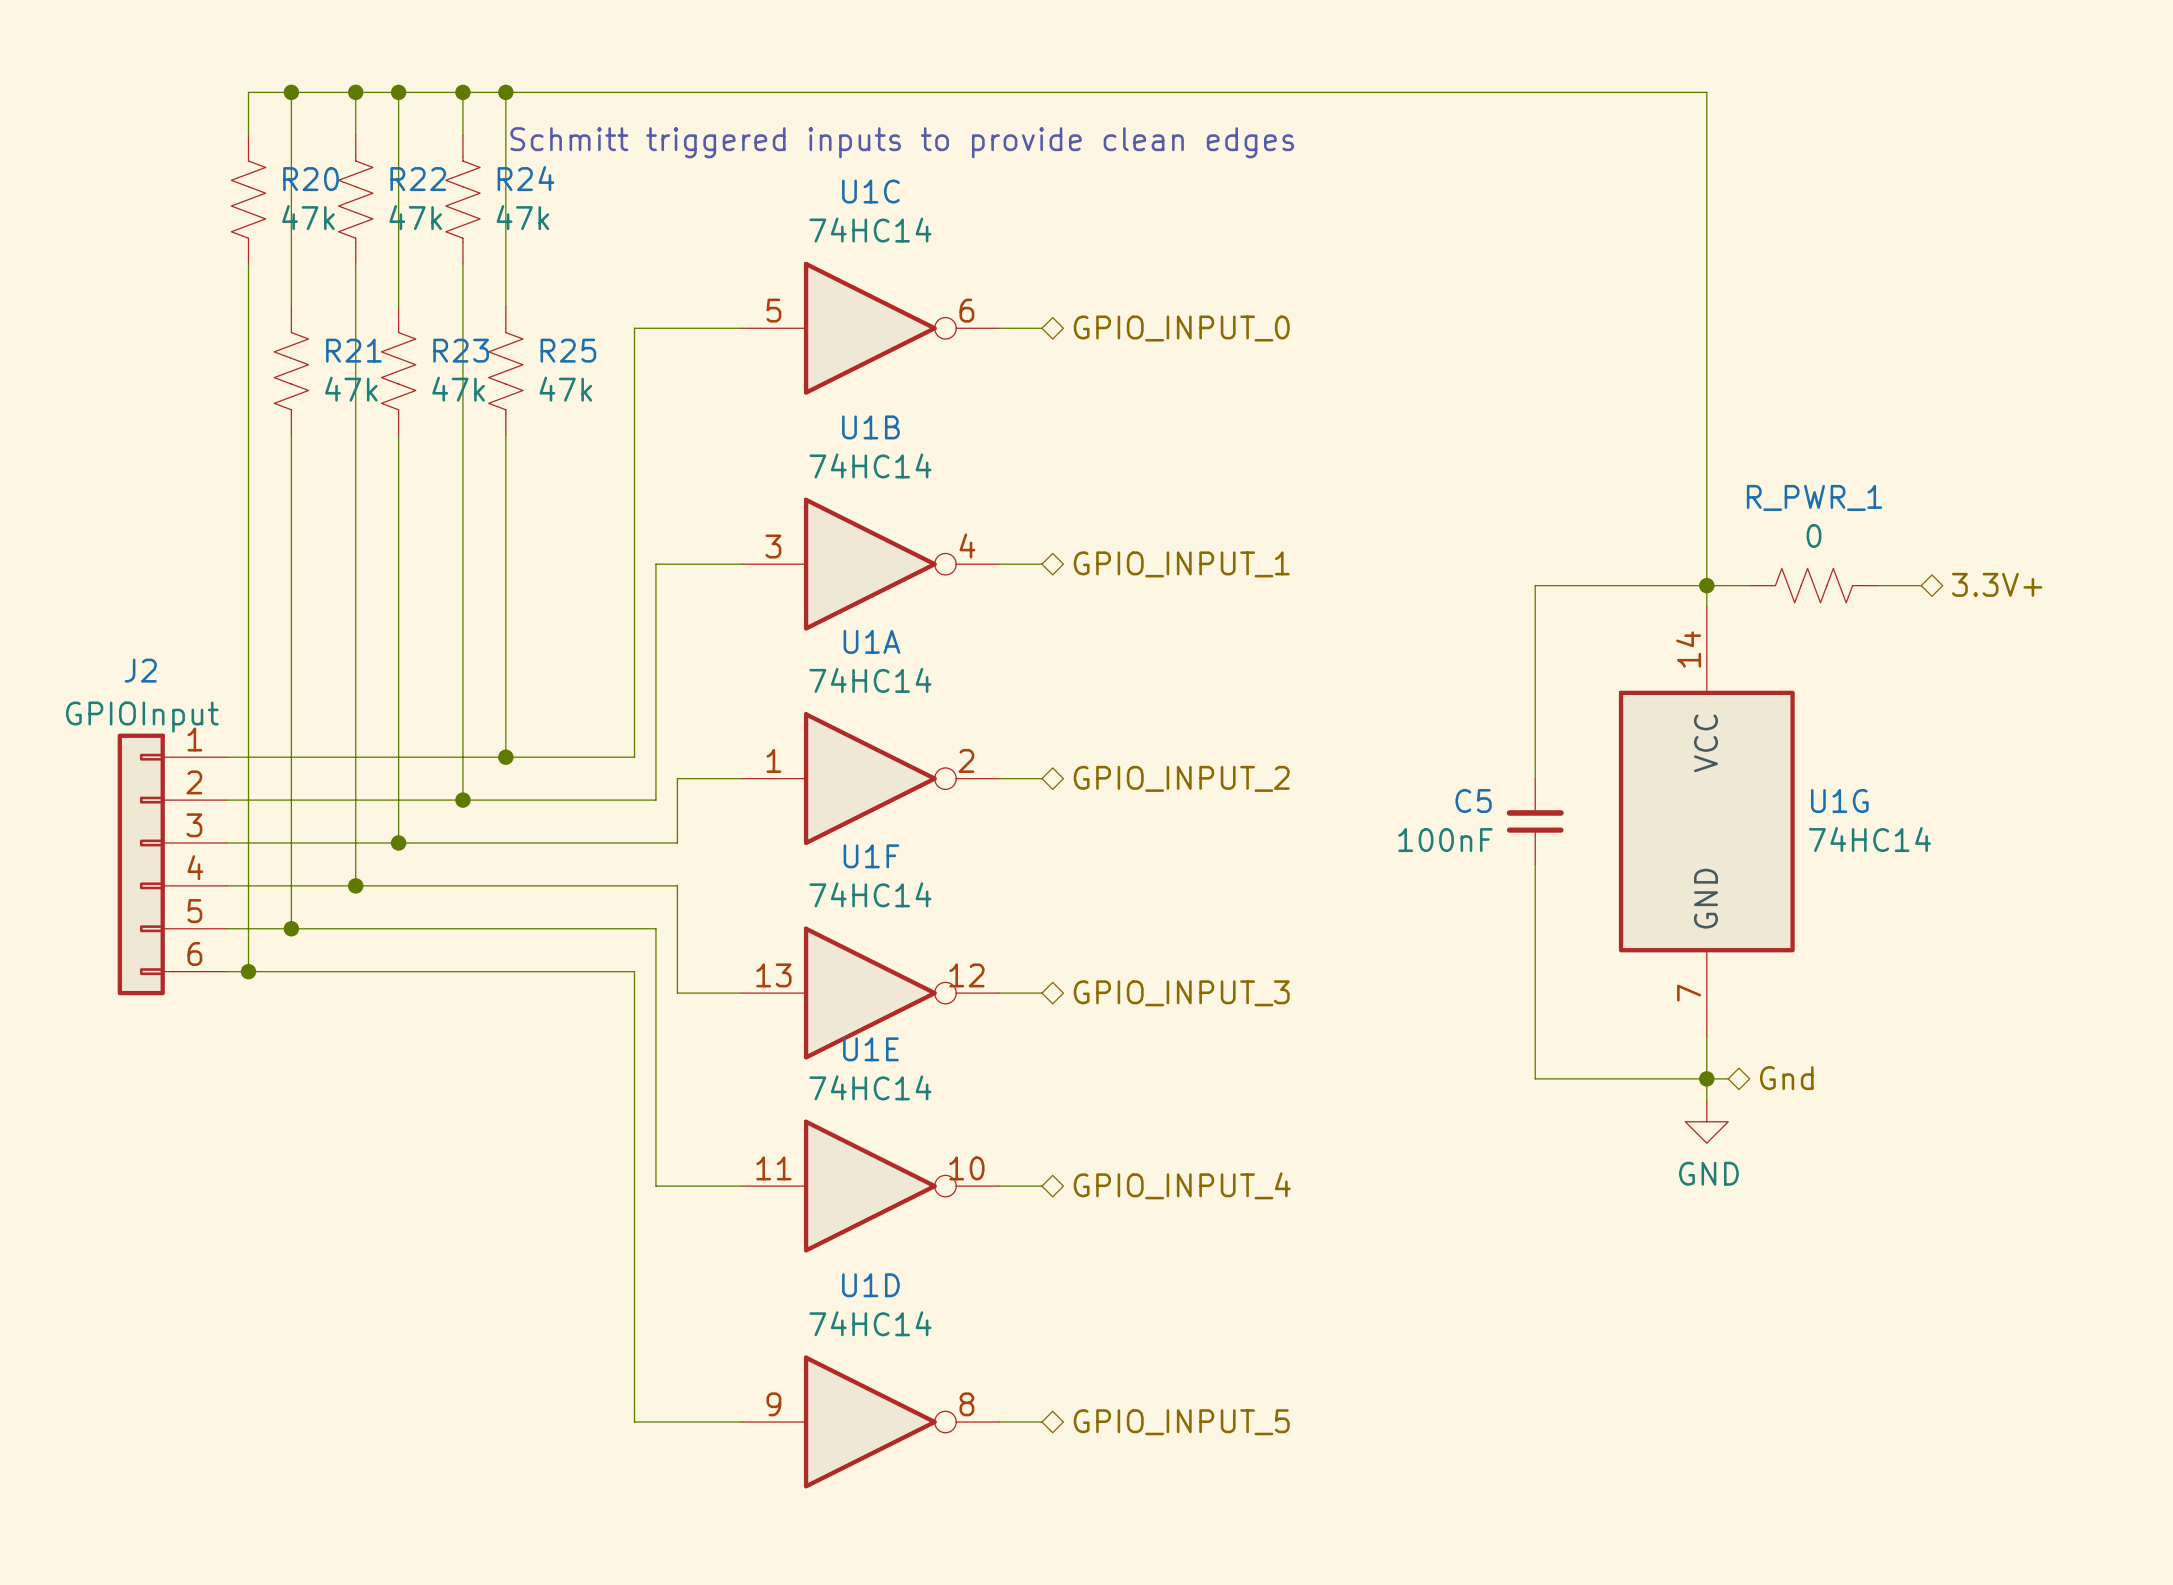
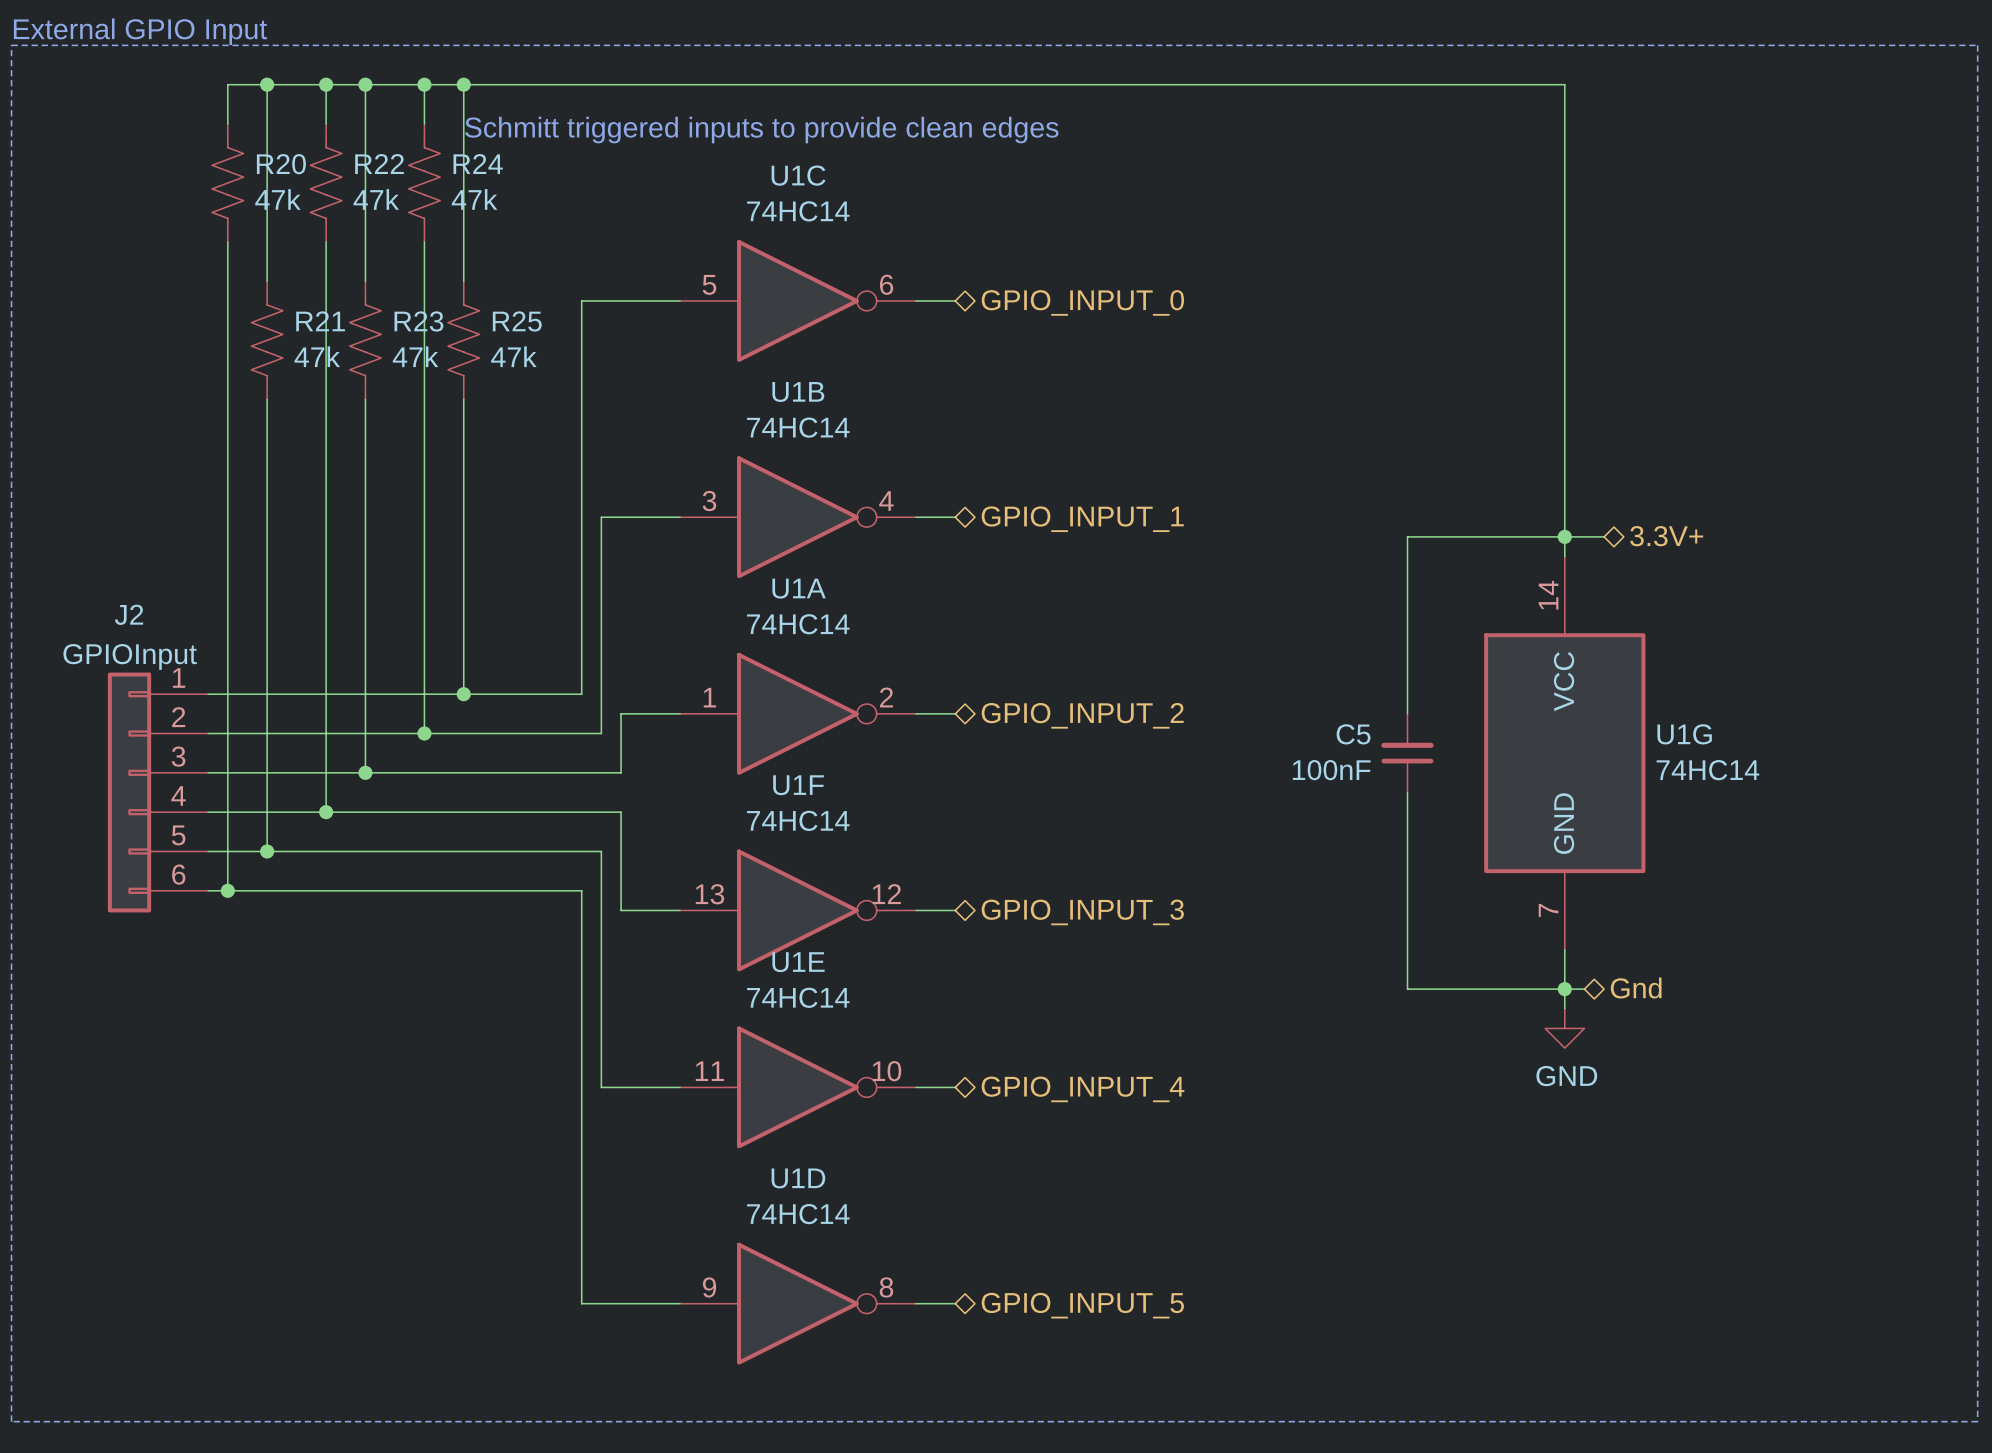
text: none -> External GPIO Input (140, 31)
line: none -> (11, 45) (1977, 45) (1977, 1421) (11, 1421) (11, 45)
hierarchical label position: 3.3V+ (1997, 584) -> 3.3V+ (1666, 536)
R_PWR_1: 0 (1814, 585) -> none
wire: (1878, 585) (1921, 585) -> none

